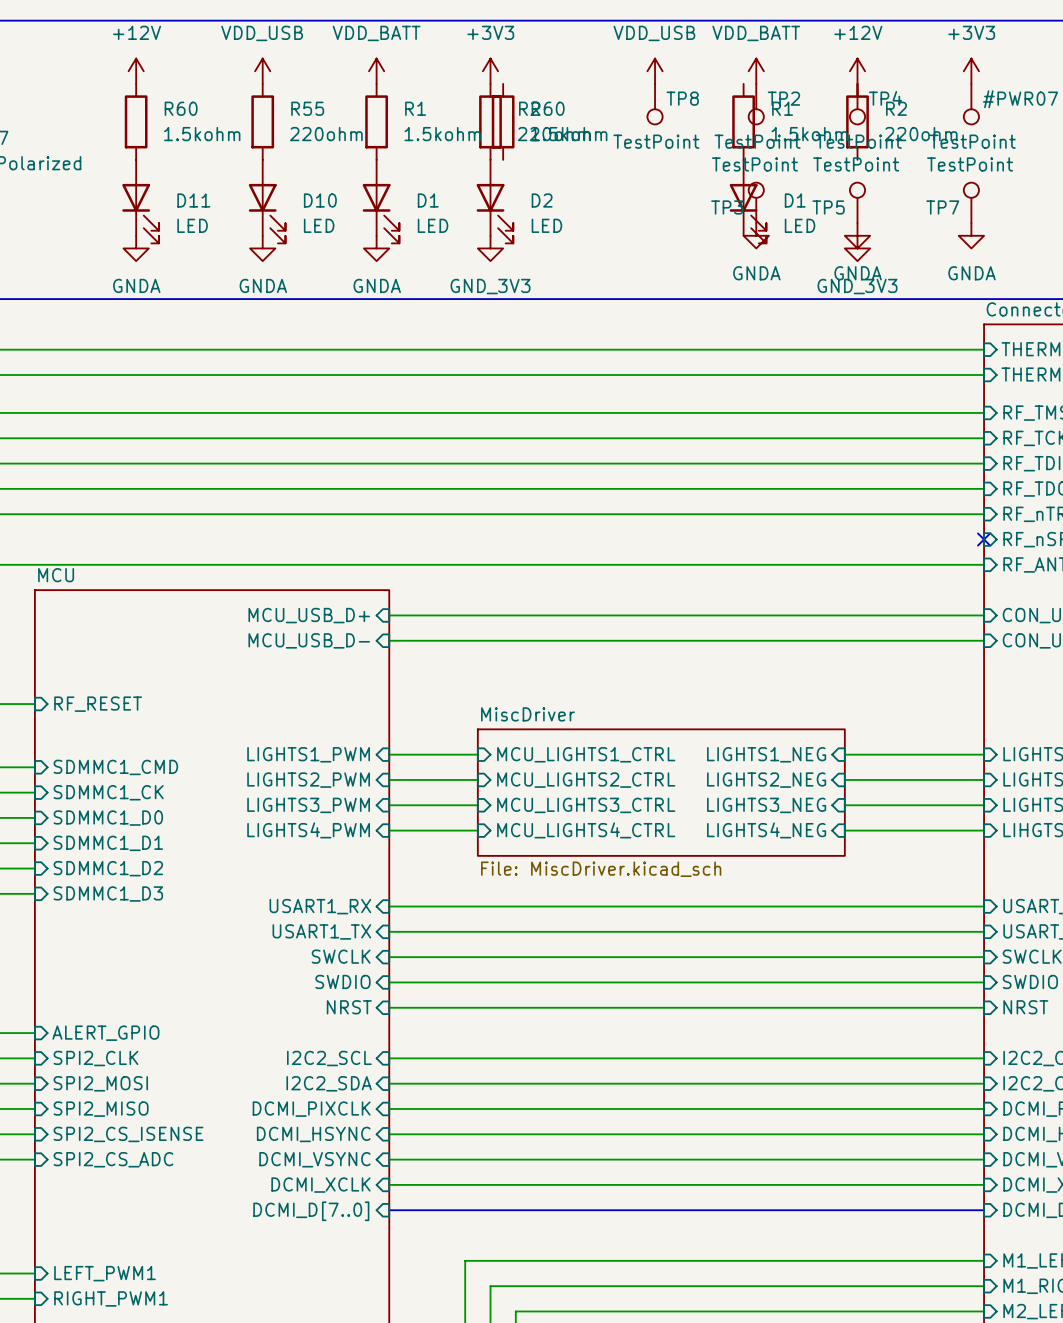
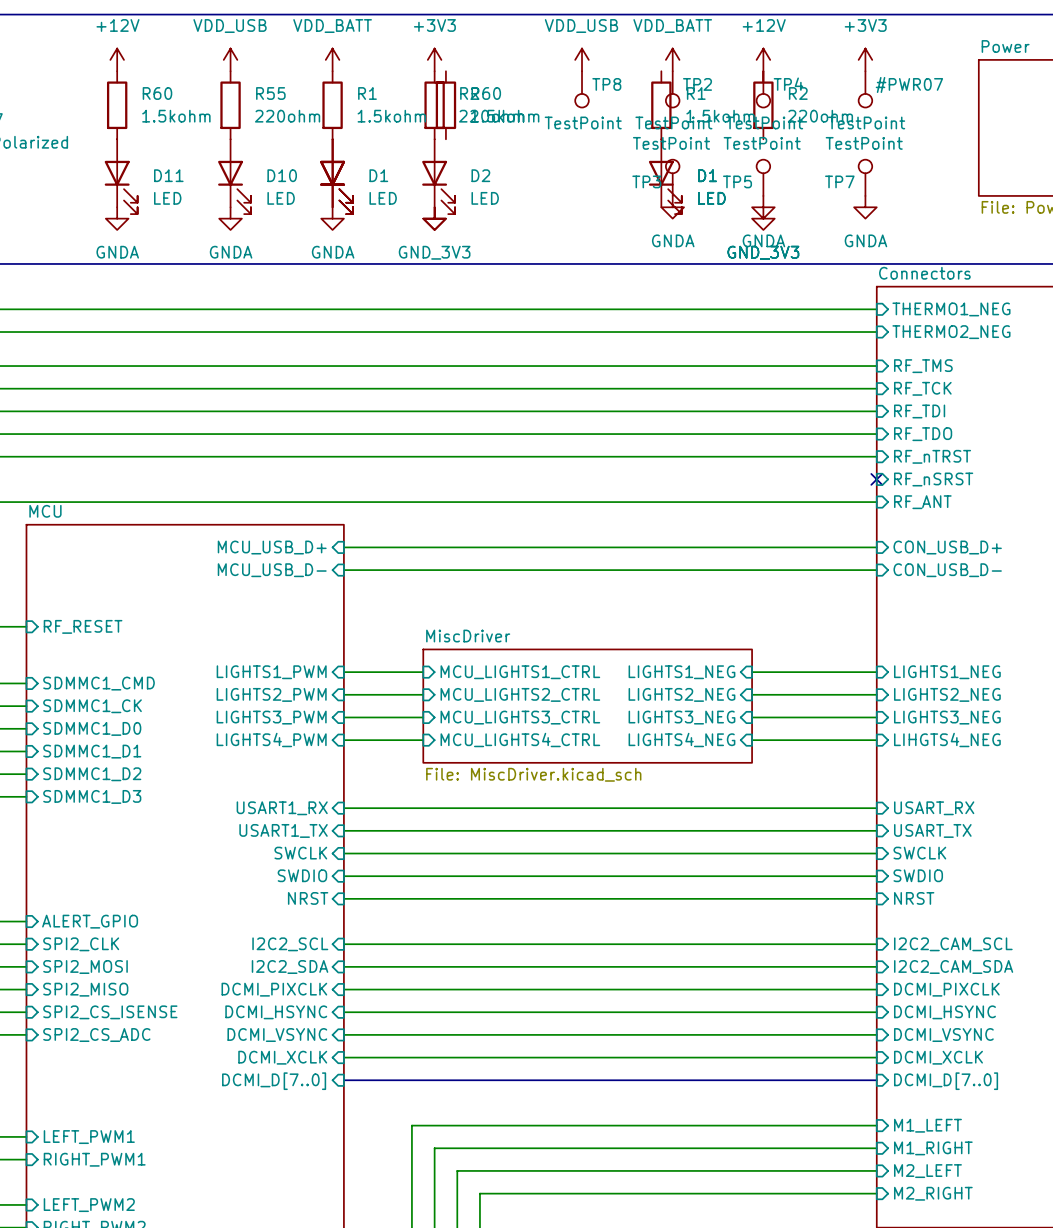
D1: none -> LED (336, 176)
power symbol: none -> GND_3V3 (434, 218)

